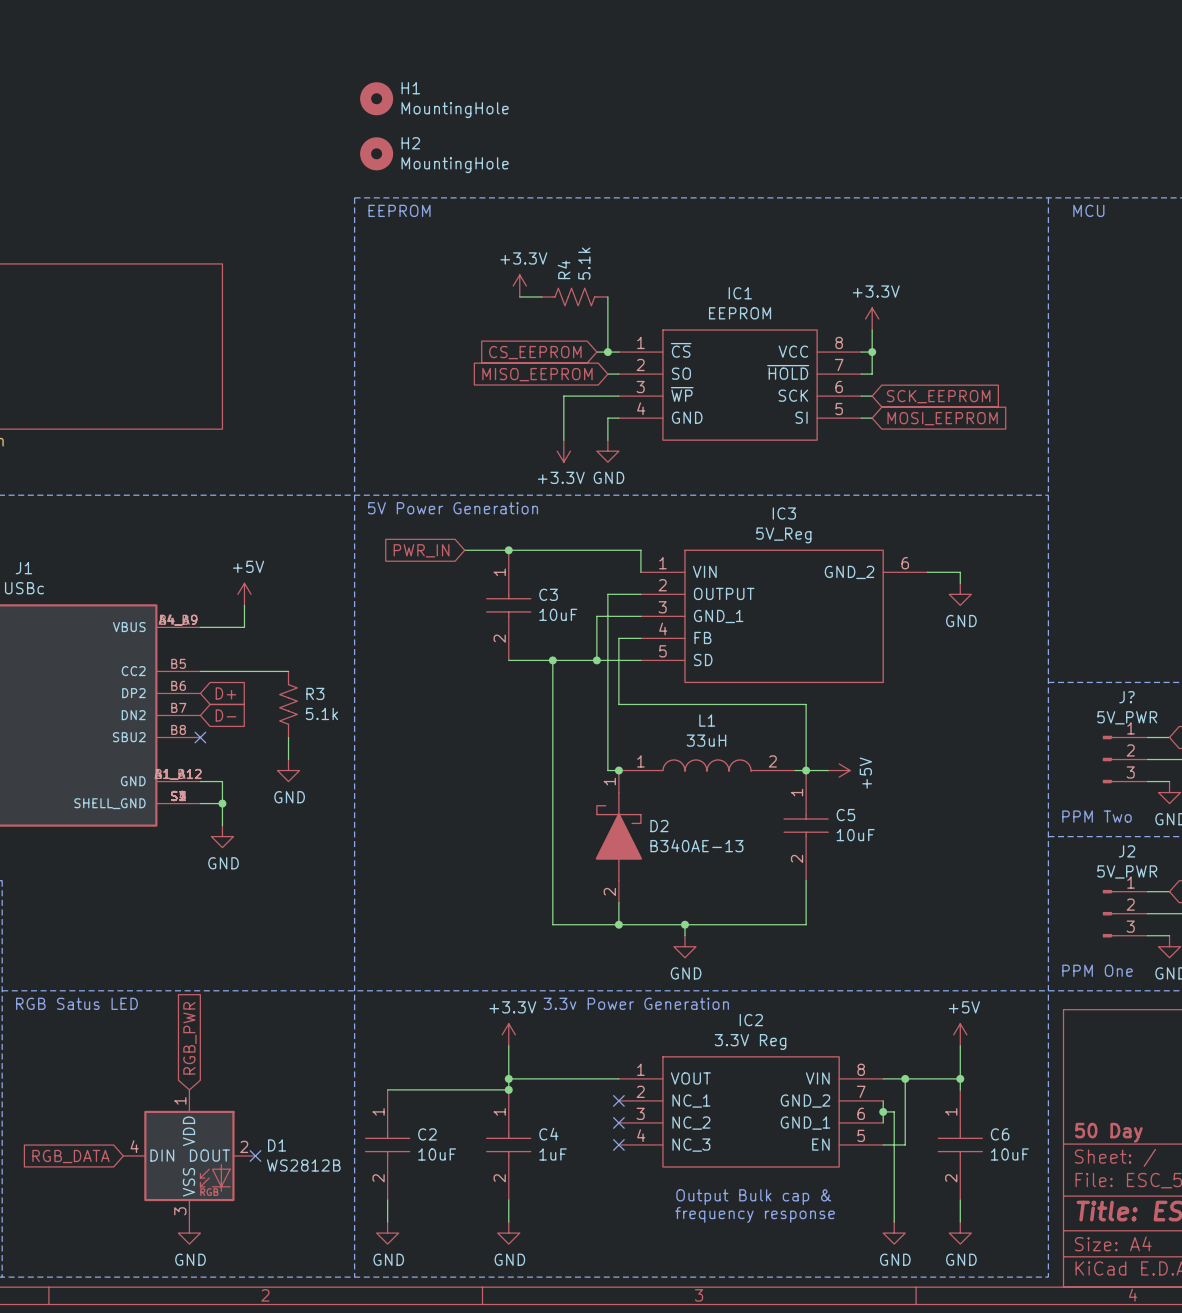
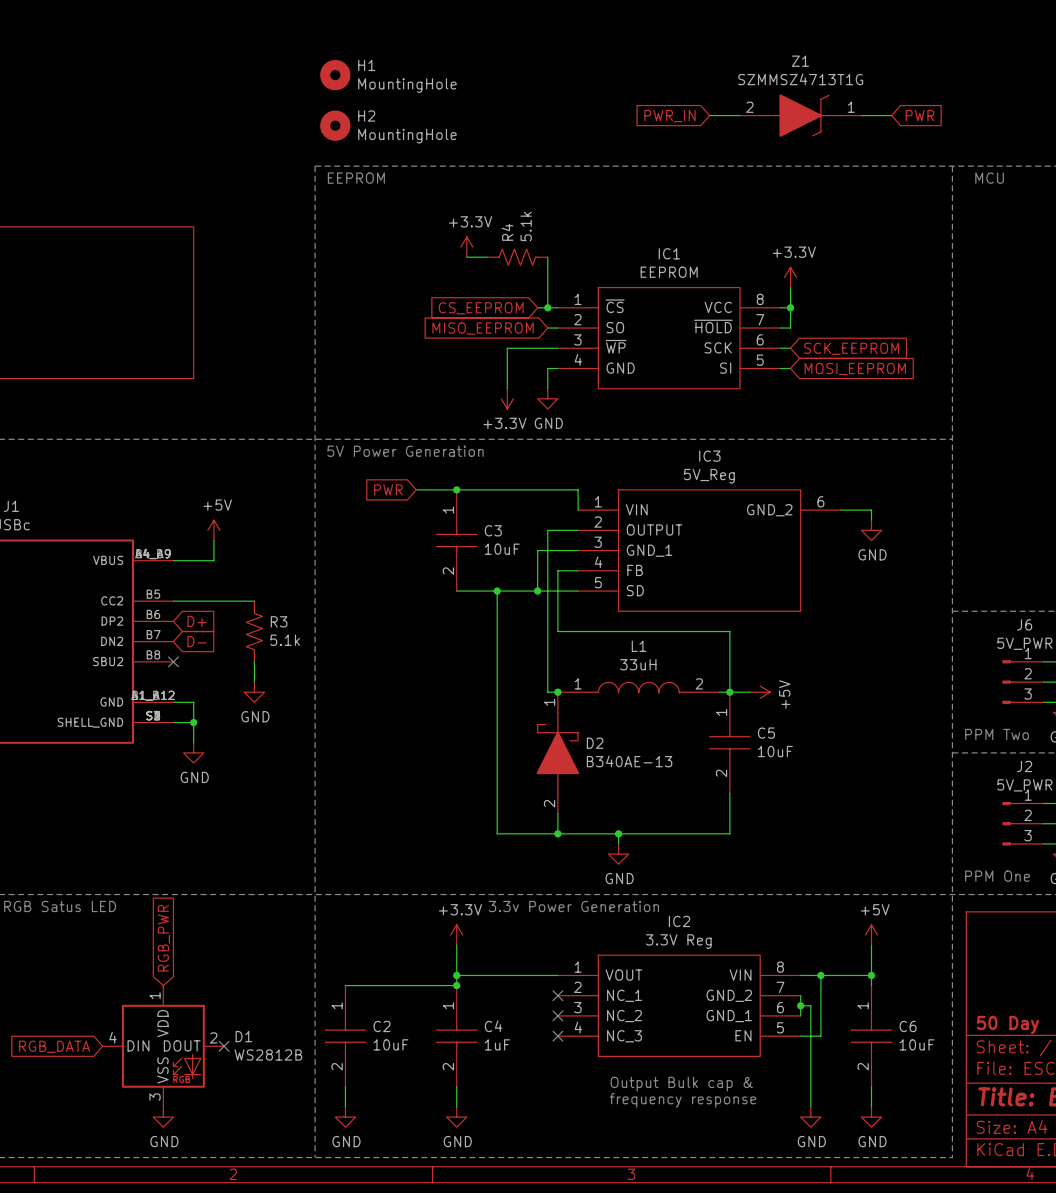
wire: none -> (709, 115) (739, 115)
Z1: none -> SZMMSZ4713T1G (800, 115)
wire: none -> (861, 115) (891, 115)
global label: none -> PWR (920, 115)
global label: none -> PWR_IN (669, 116)
global label: PWR_IN (421, 550) -> PWR (388, 489)
J? name: J? (1126, 697) -> J6 (1024, 624)

